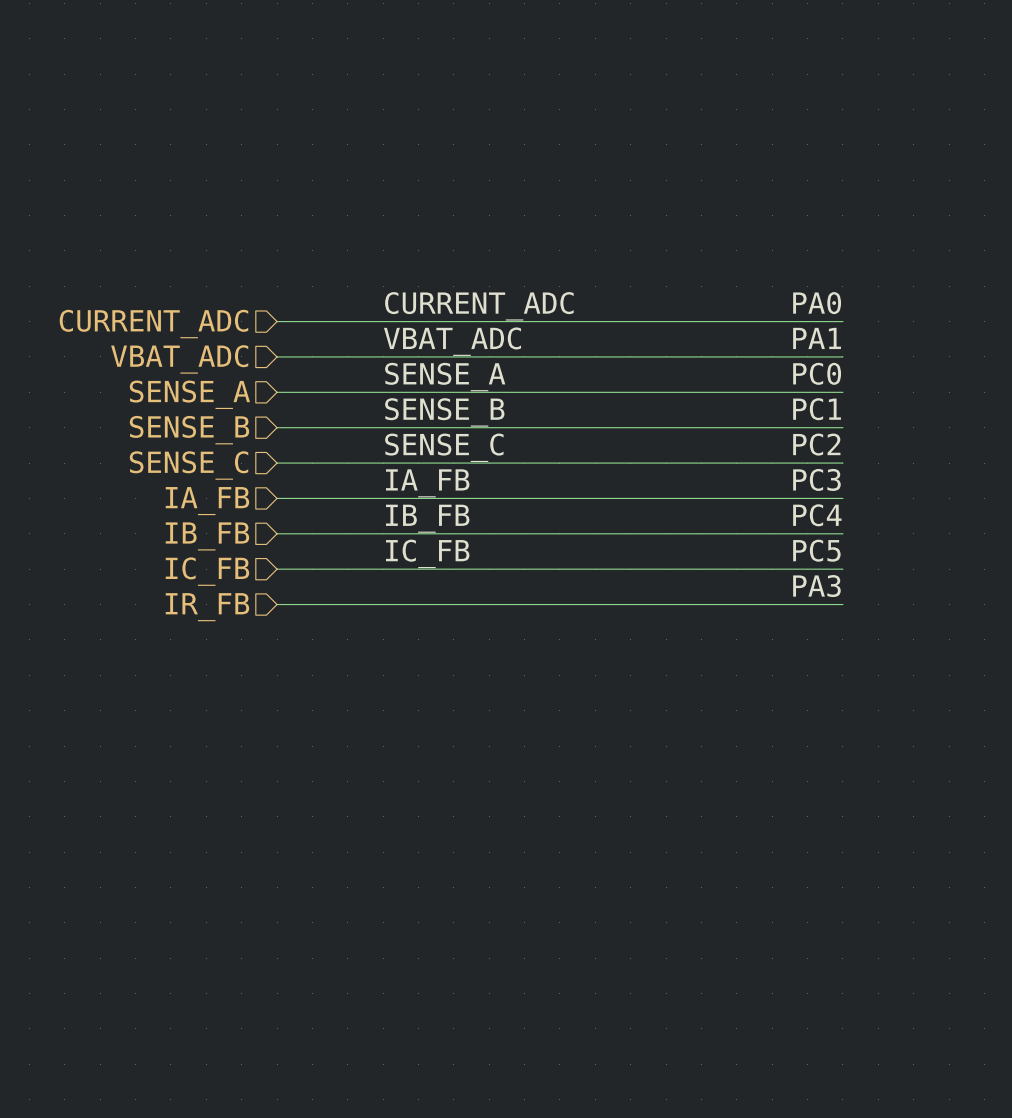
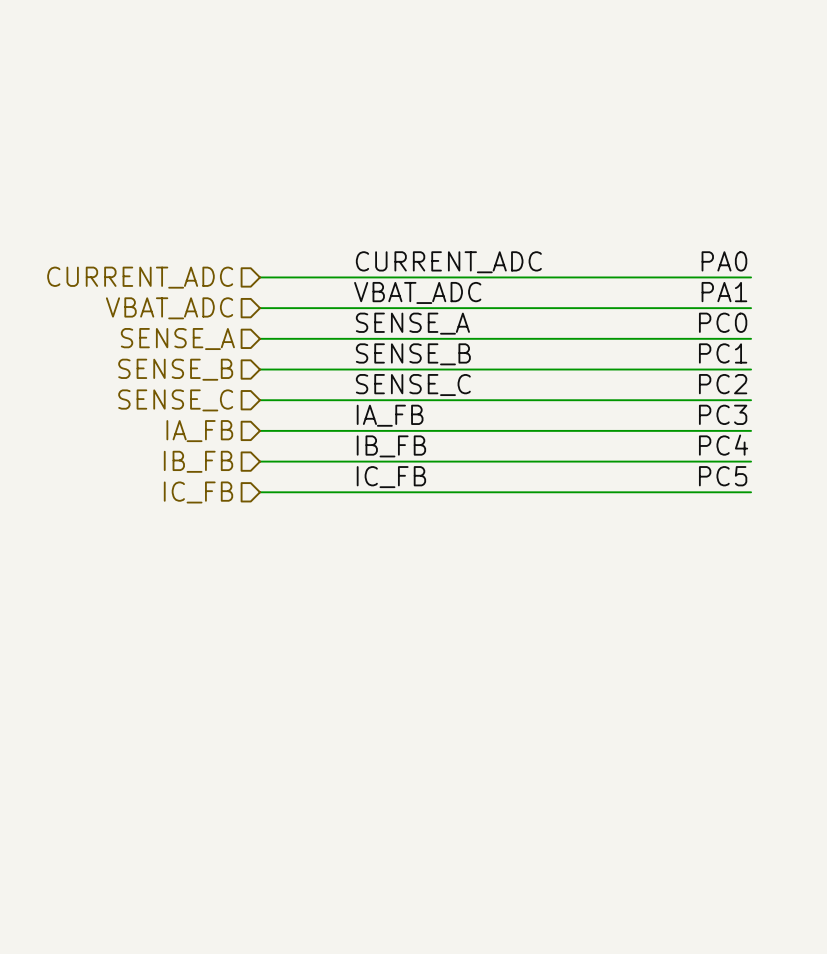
label: PA3 (816, 586) -> none
wire: (277, 604) (842, 604) -> none
hierarchical label: IR_FB (207, 607) -> none

